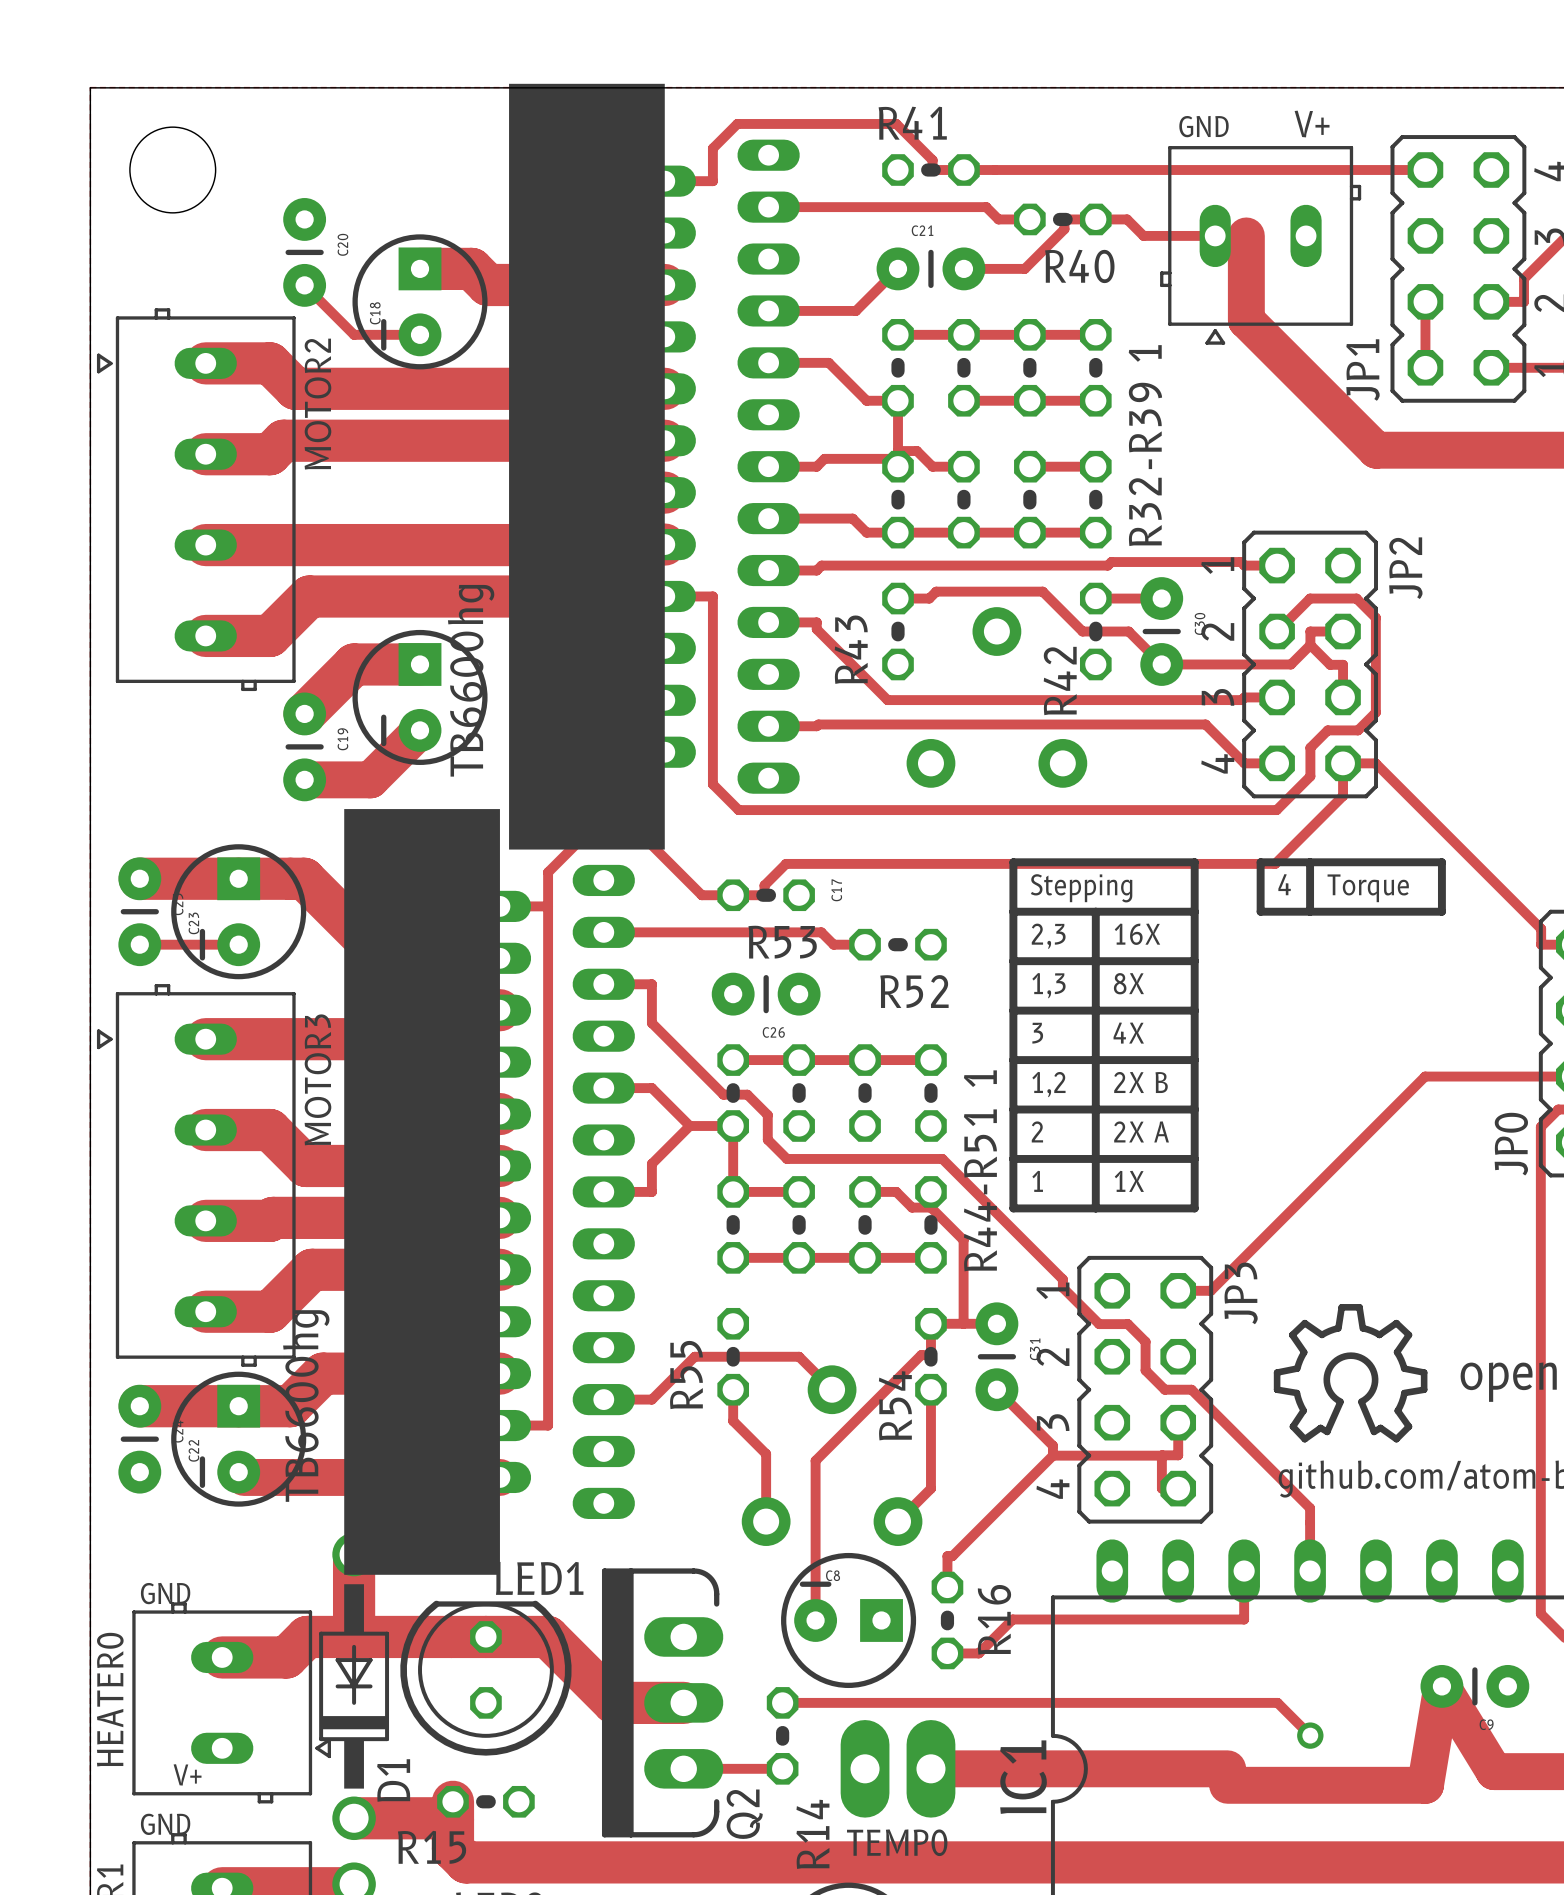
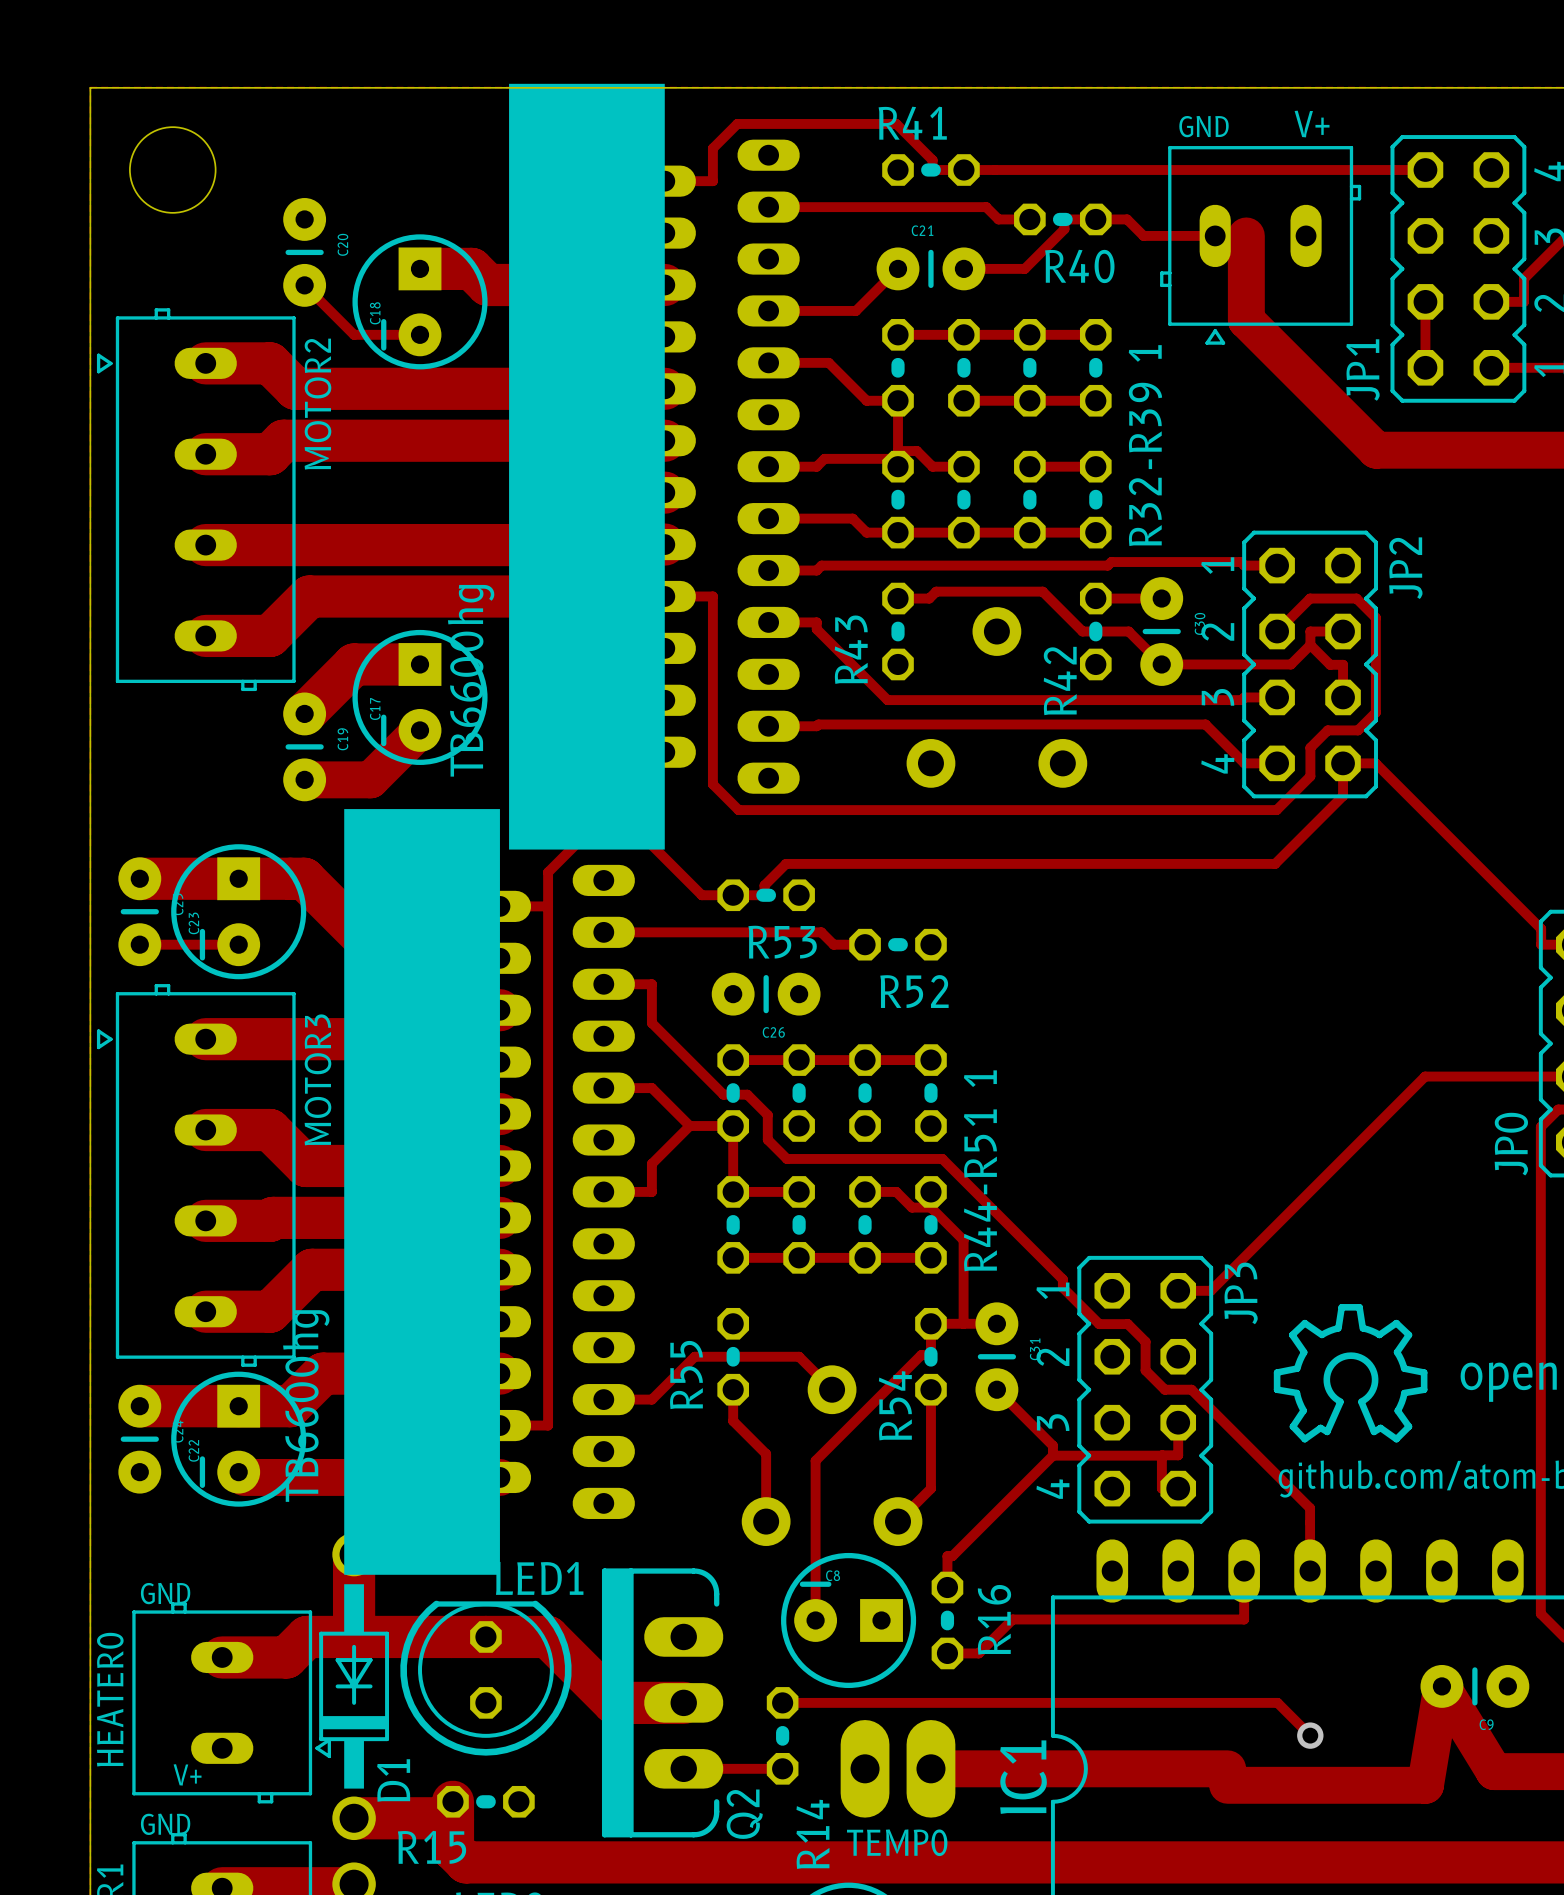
line: (1013, 862) (1013, 1208) (1194, 1208) (1194, 862) (1013, 862) -> none
line: (1260, 862) (1441, 862) (1441, 911) (1260, 911) (1260, 862) -> none
line: (1310, 862) (1310, 911) -> none
text: 4 (1284, 884) -> none
text: Stepping (1081, 888) -> none
text: Torque (1368, 888) -> none
C17 name position: C17 (836, 890) -> C17 (375, 709)
line: (1013, 911) (1194, 911) -> none
line: (1095, 911) (1095, 1208) -> none
text: 16X (1137, 934) -> none
text: 2,3 (1048, 936) -> none
line: (1013, 961) (1194, 961) -> none
text: 8X (1128, 983) -> none
text: 1,3 (1048, 985) -> none
line: (1013, 1010) (1194, 1010) -> none
text: 3 (1037, 1033) -> none
text: 4X (1128, 1033) -> none
line: (1013, 1060) (1194, 1060) -> none
text: 2X B (1140, 1082) -> none
text: 1,2 (1048, 1084) -> none
line: (1013, 1109) (1194, 1109) -> none
text: 2 (1037, 1131) -> none
text: 2X A (1141, 1131) -> none
line: (1013, 1158) (1194, 1158) -> none
text: 1 (1037, 1181) -> none
text: 1X (1129, 1181) -> none

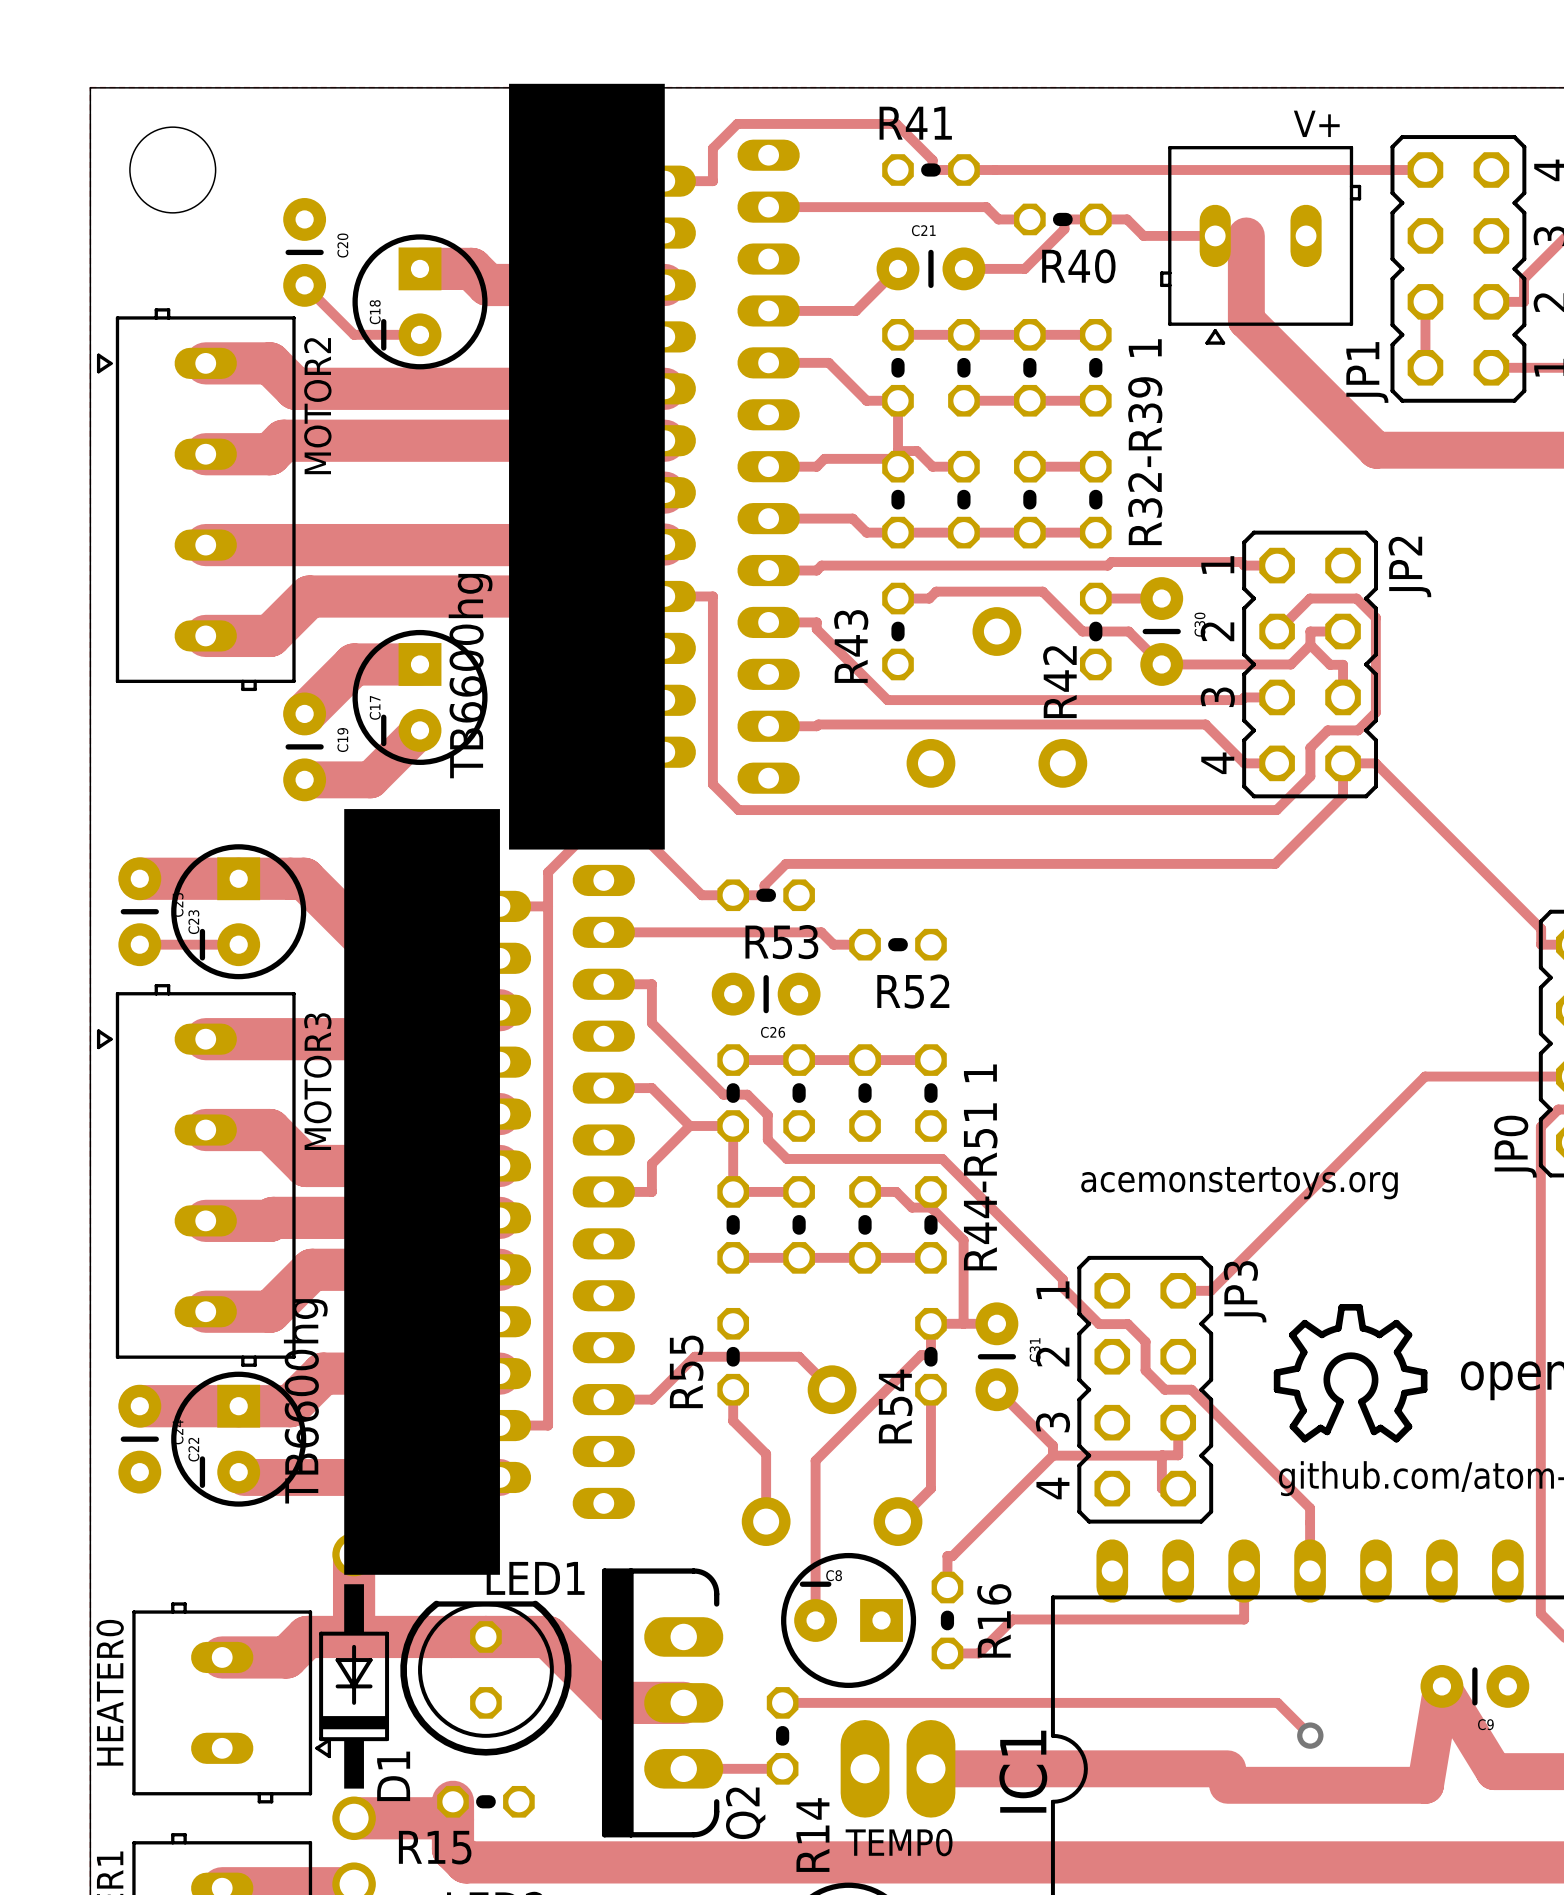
text: GND (1204, 126) -> none
text: none -> acemonstertoys.org (1239, 1183)
text: GND (165, 1593) -> none
text: V+ (187, 1774) -> none
text: GND (165, 1824) -> none

